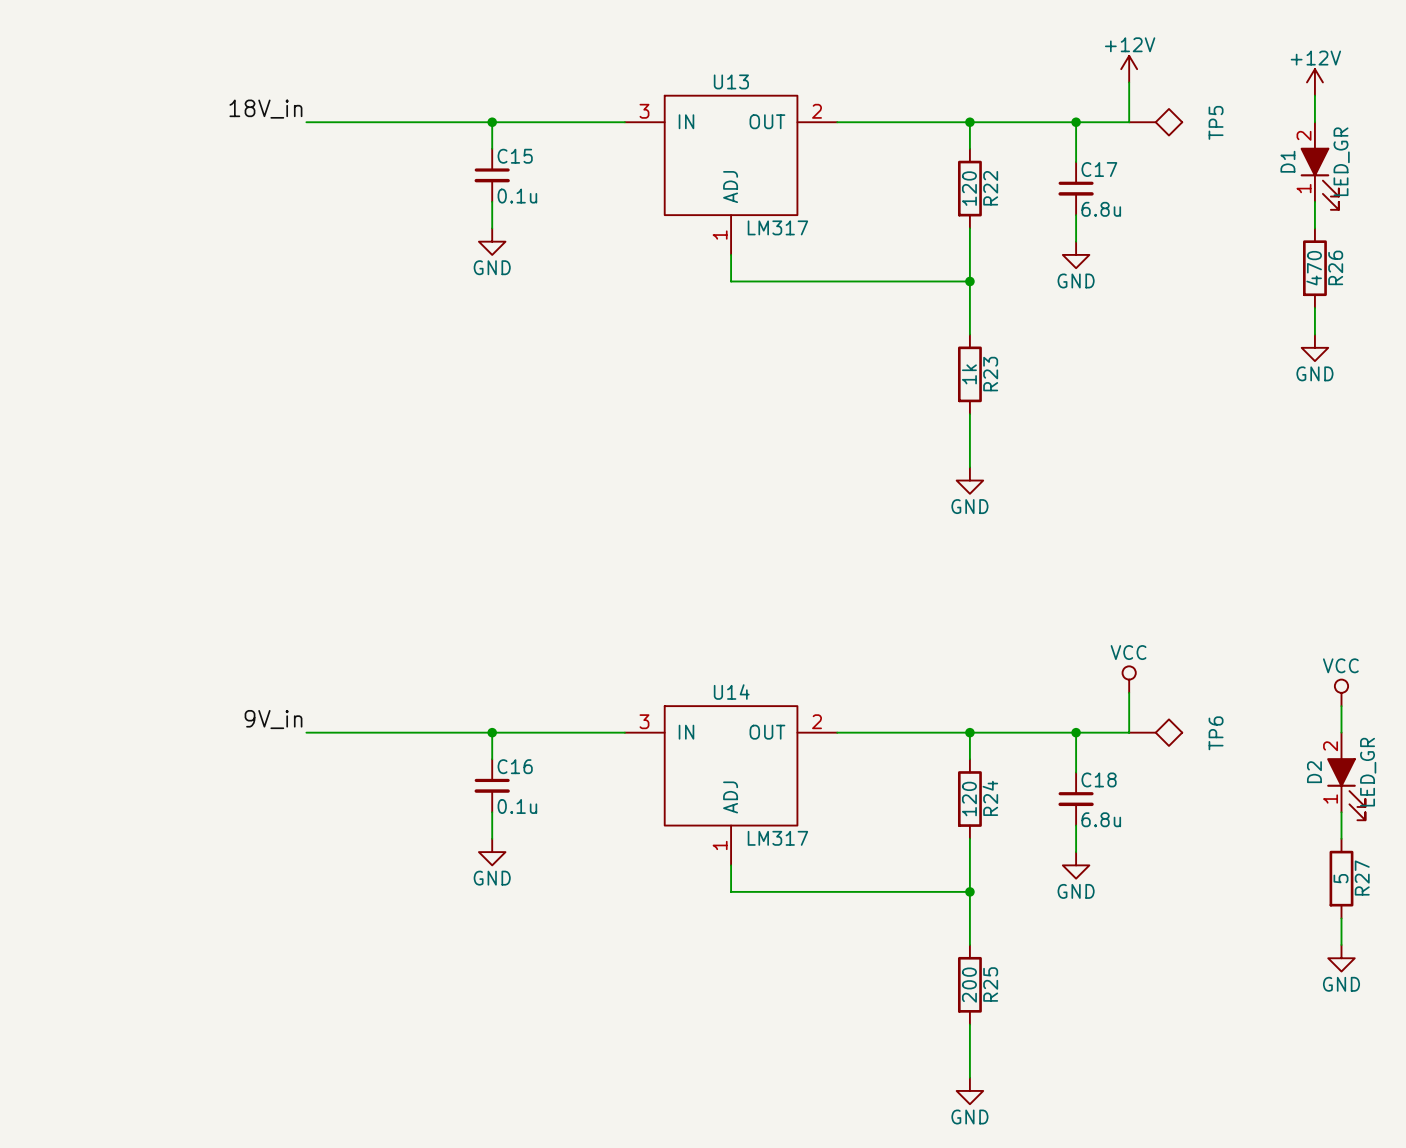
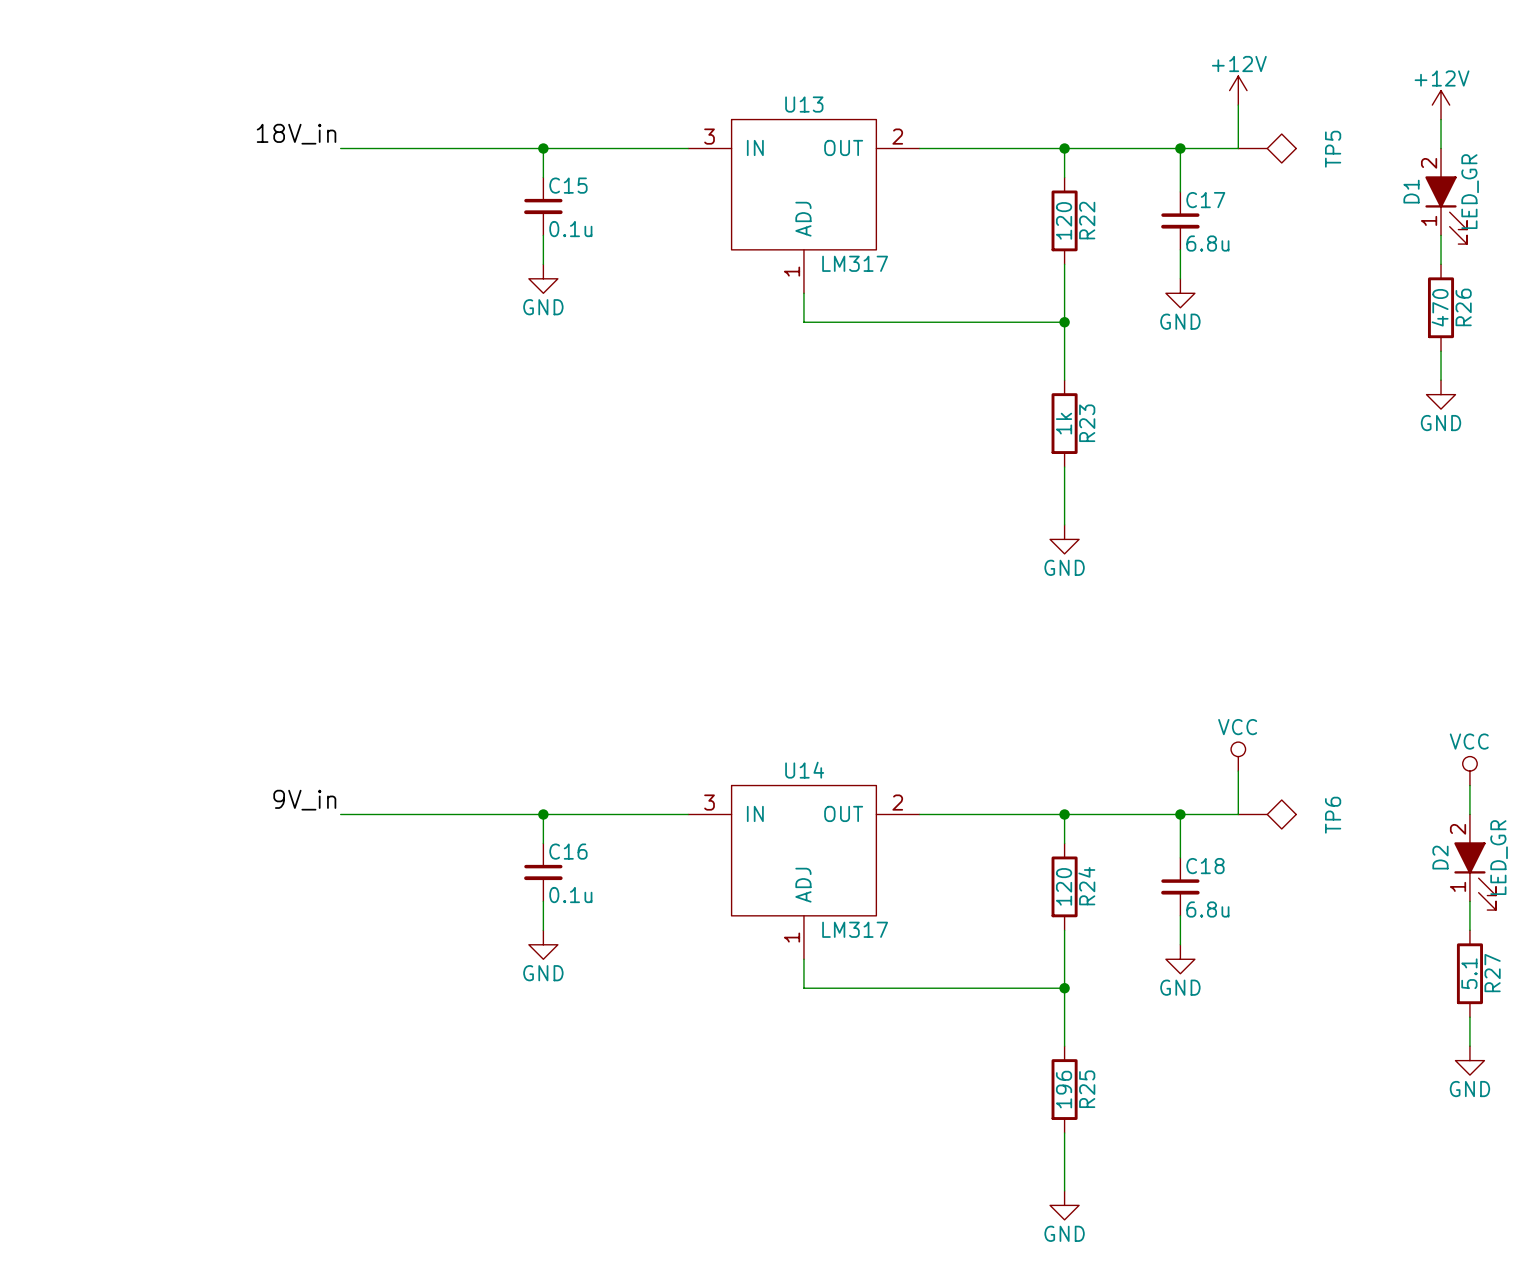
R27 value: 5 (1341, 878) -> 5.1 (1469, 973)
R25 value: 200 (969, 985) -> 196 (1064, 1089)

